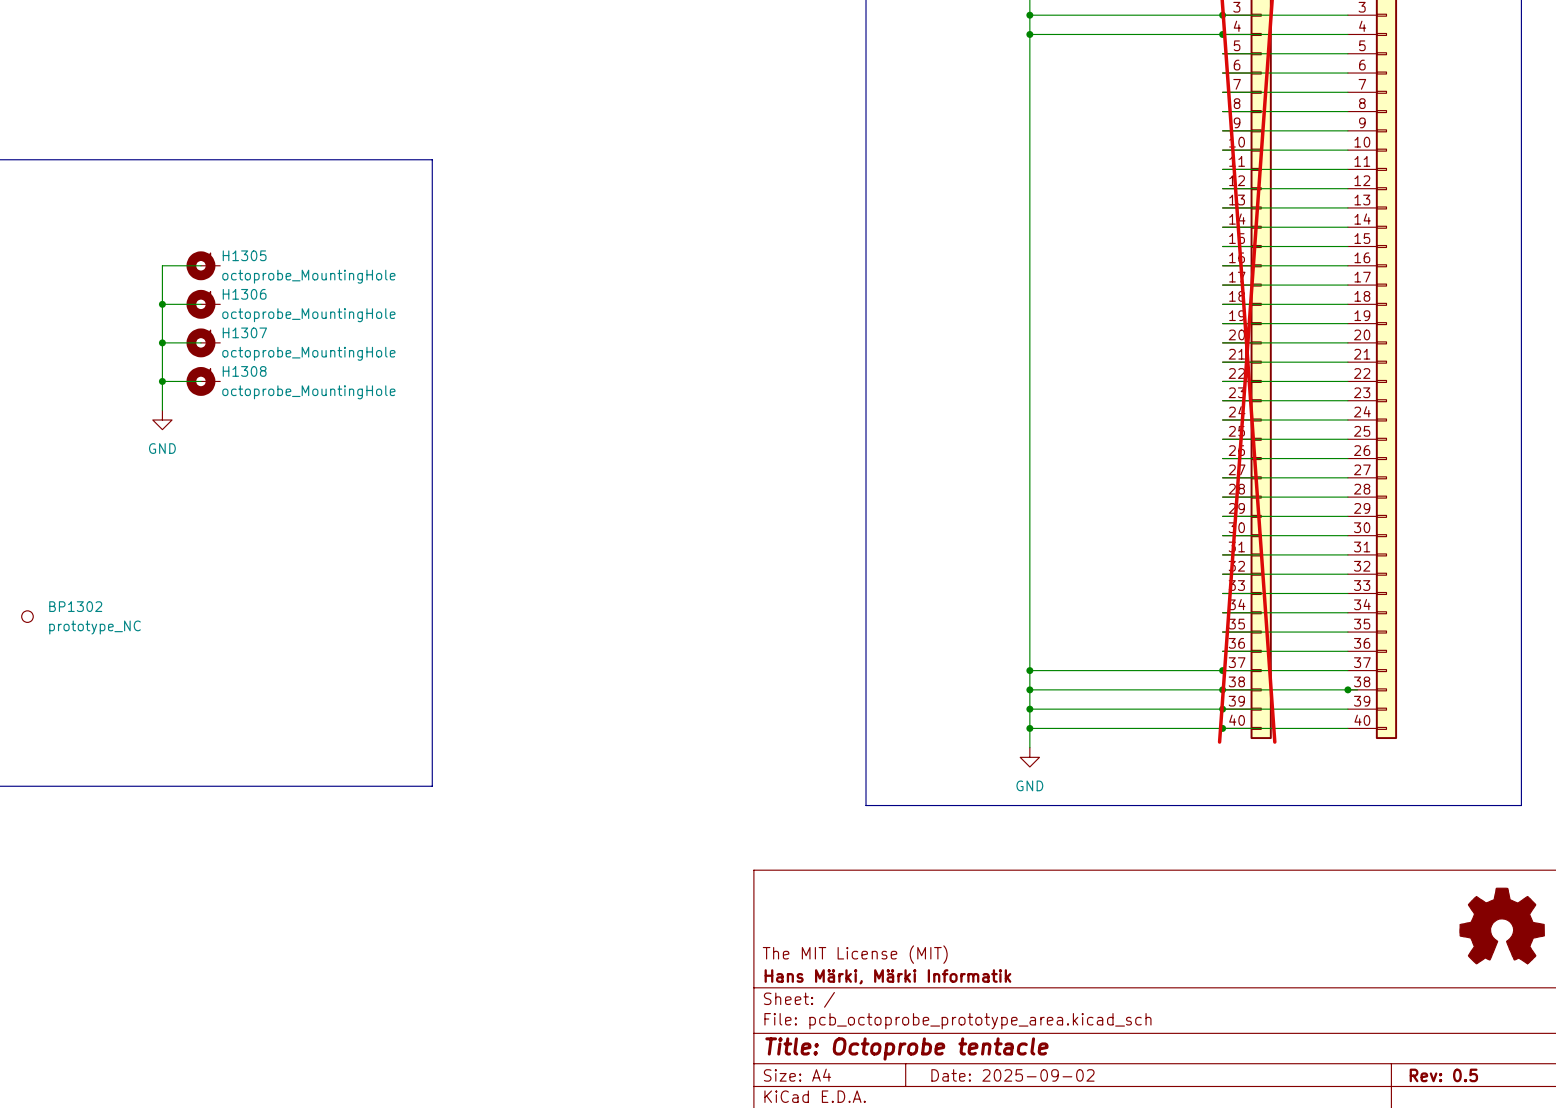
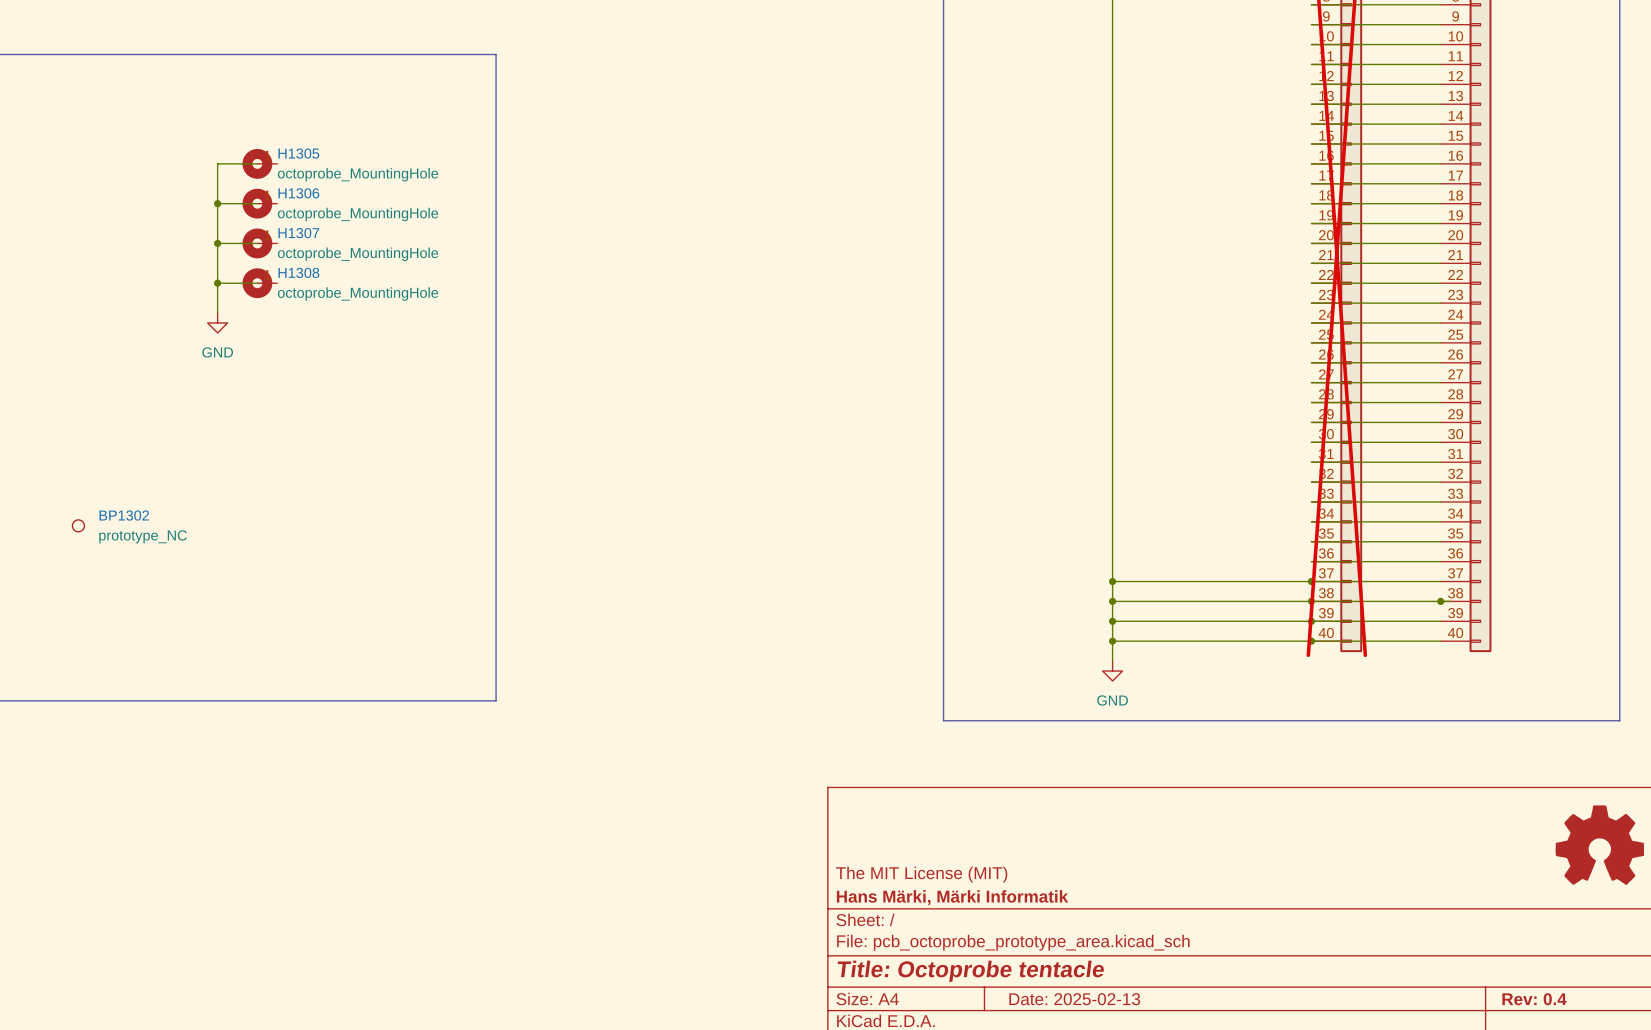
title block: Date: 2025-09-02 (1012, 1075) -> Date: 2025-02-13 (1074, 999)
title block: Rev: 0.5 (1443, 1075) -> Rev: 0.4 (1534, 999)

